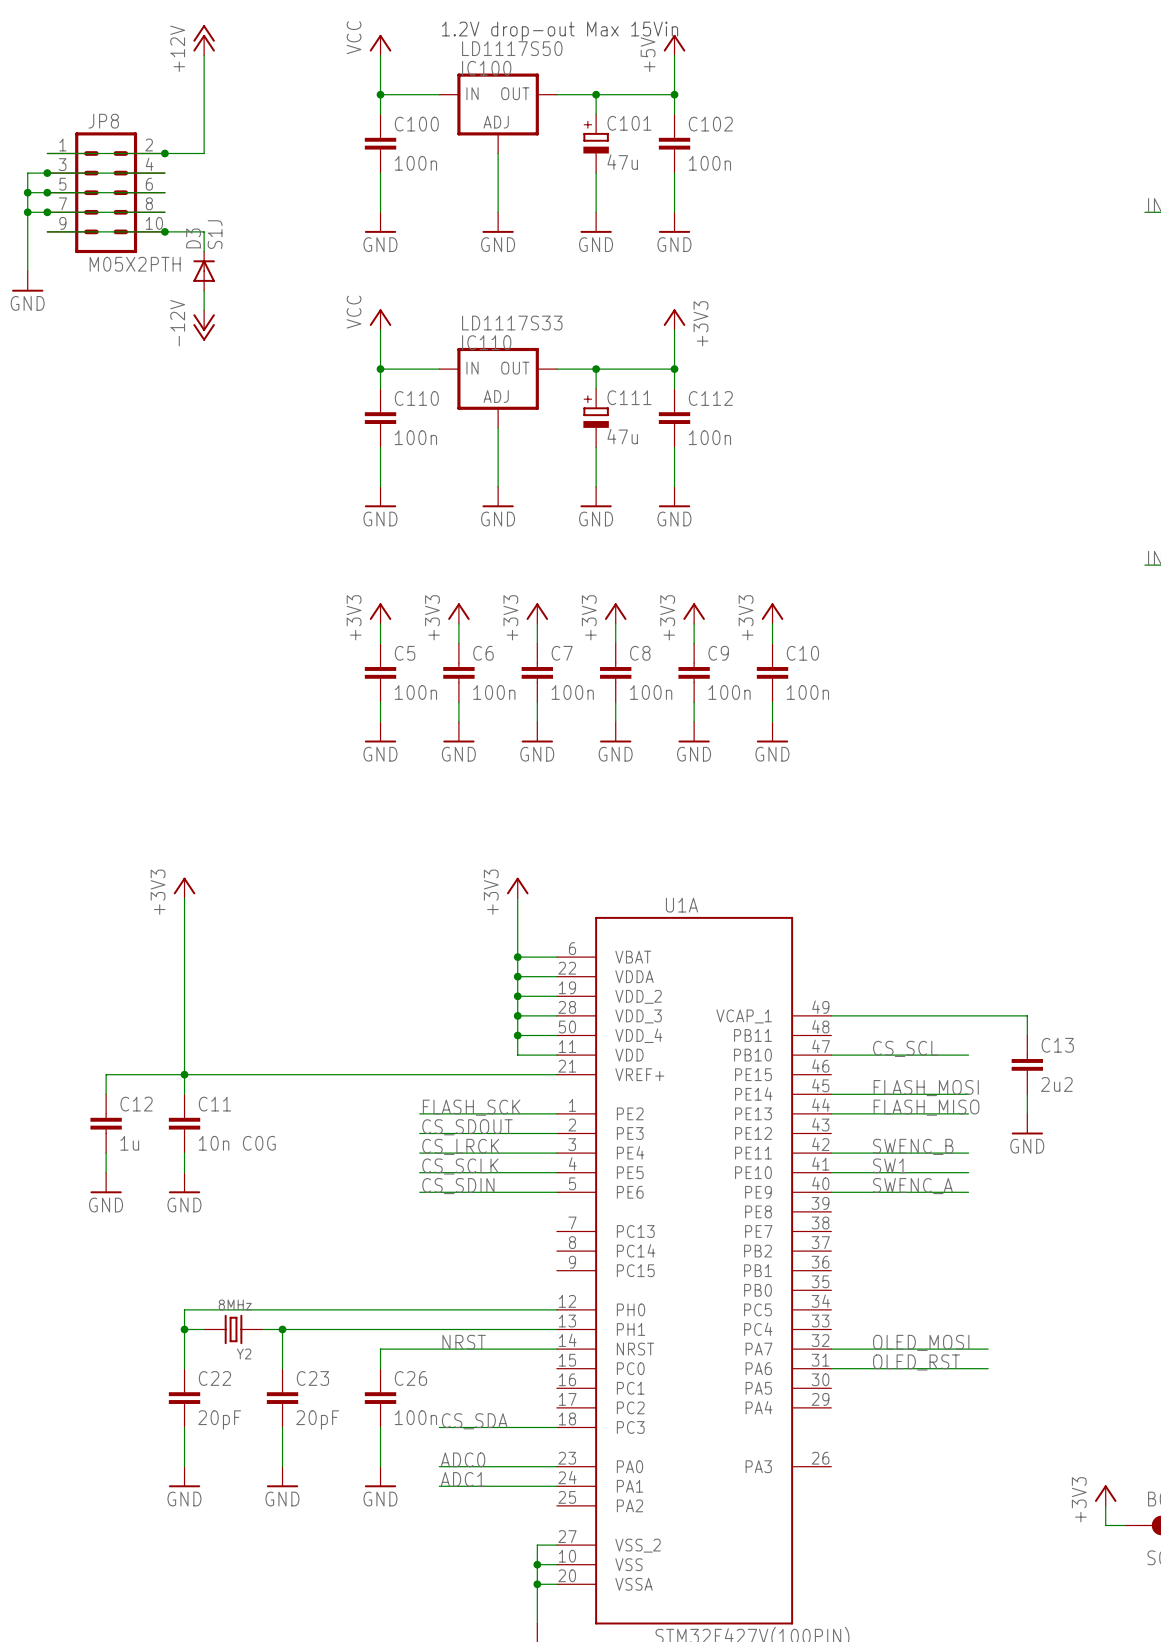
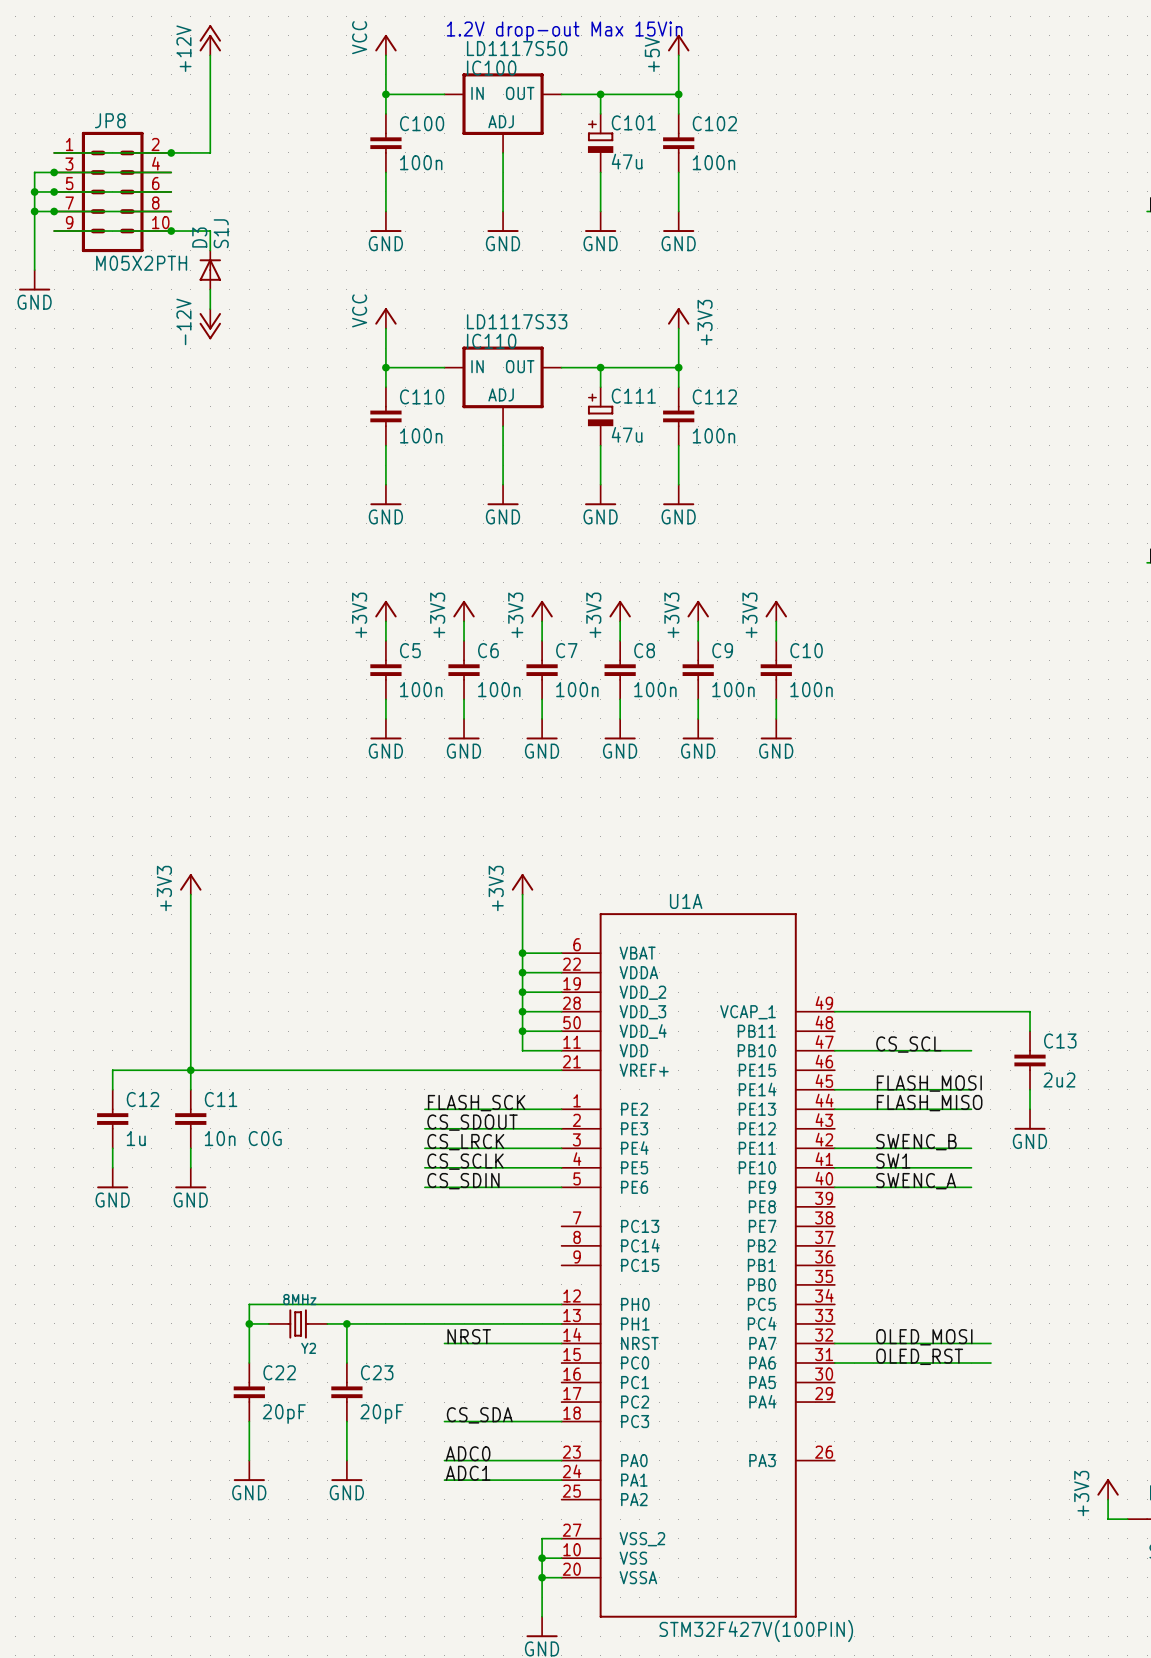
wire: (243, 1309) (184, 1309) (184, 1368) -> (249, 1304) (249, 1363)
wire: (184, 1329) (204, 1329) -> none
junction: (184, 1329) -> none
Y2 position: (233, 1329) -> (298, 1323)
junction: none -> (249, 1323)
wire: (282, 1329) (282, 1368) -> (346, 1323) (346, 1363)
junction: (282, 1329) -> none
junction: none -> (346, 1323)
wire: (439, 1349) (380, 1349) (380, 1368) -> none
C22 position: (184, 1398) -> (249, 1392)
C23 position: (282, 1398) -> (346, 1392)
C26: 100n (380, 1398) -> none
wire: (184, 1427) (184, 1466) -> (249, 1421) (249, 1460)
wire: (282, 1427) (282, 1466) -> (346, 1421) (346, 1460)
wire: (380, 1427) (380, 1466) -> none
power symbol: GND (184, 1476) -> none
power symbol: none -> GND (249, 1470)
power symbol: GND (282, 1476) -> none
power symbol: none -> GND (346, 1470)
power symbol: GND (380, 1476) -> none

